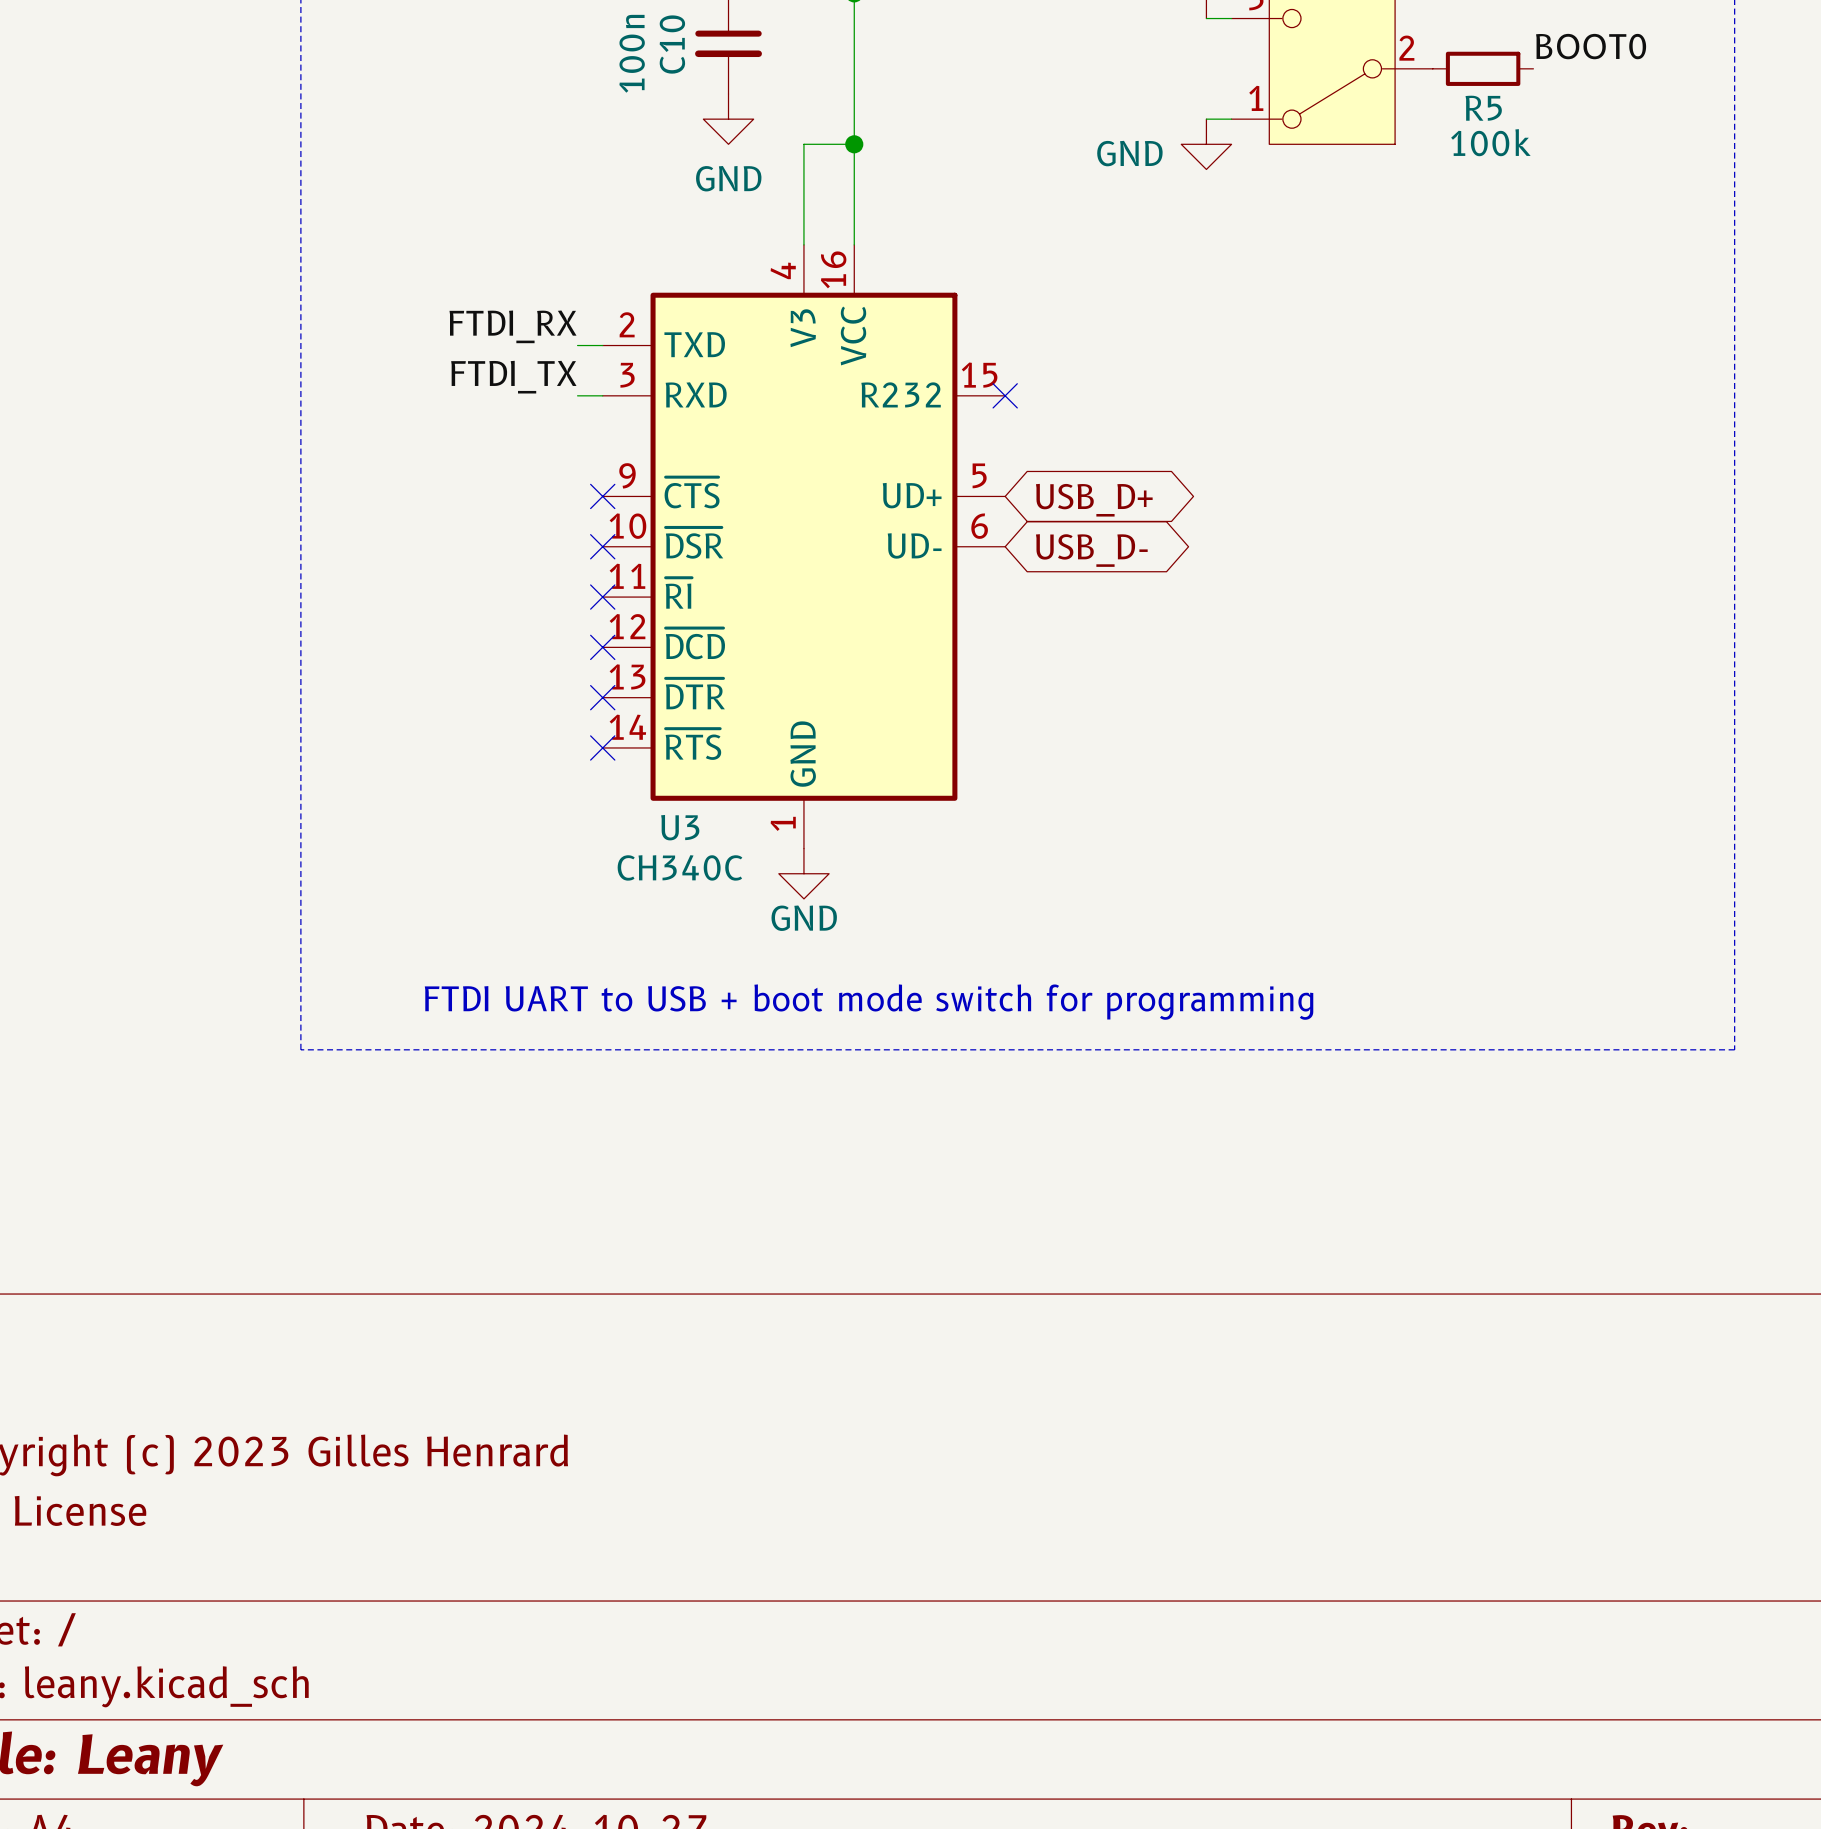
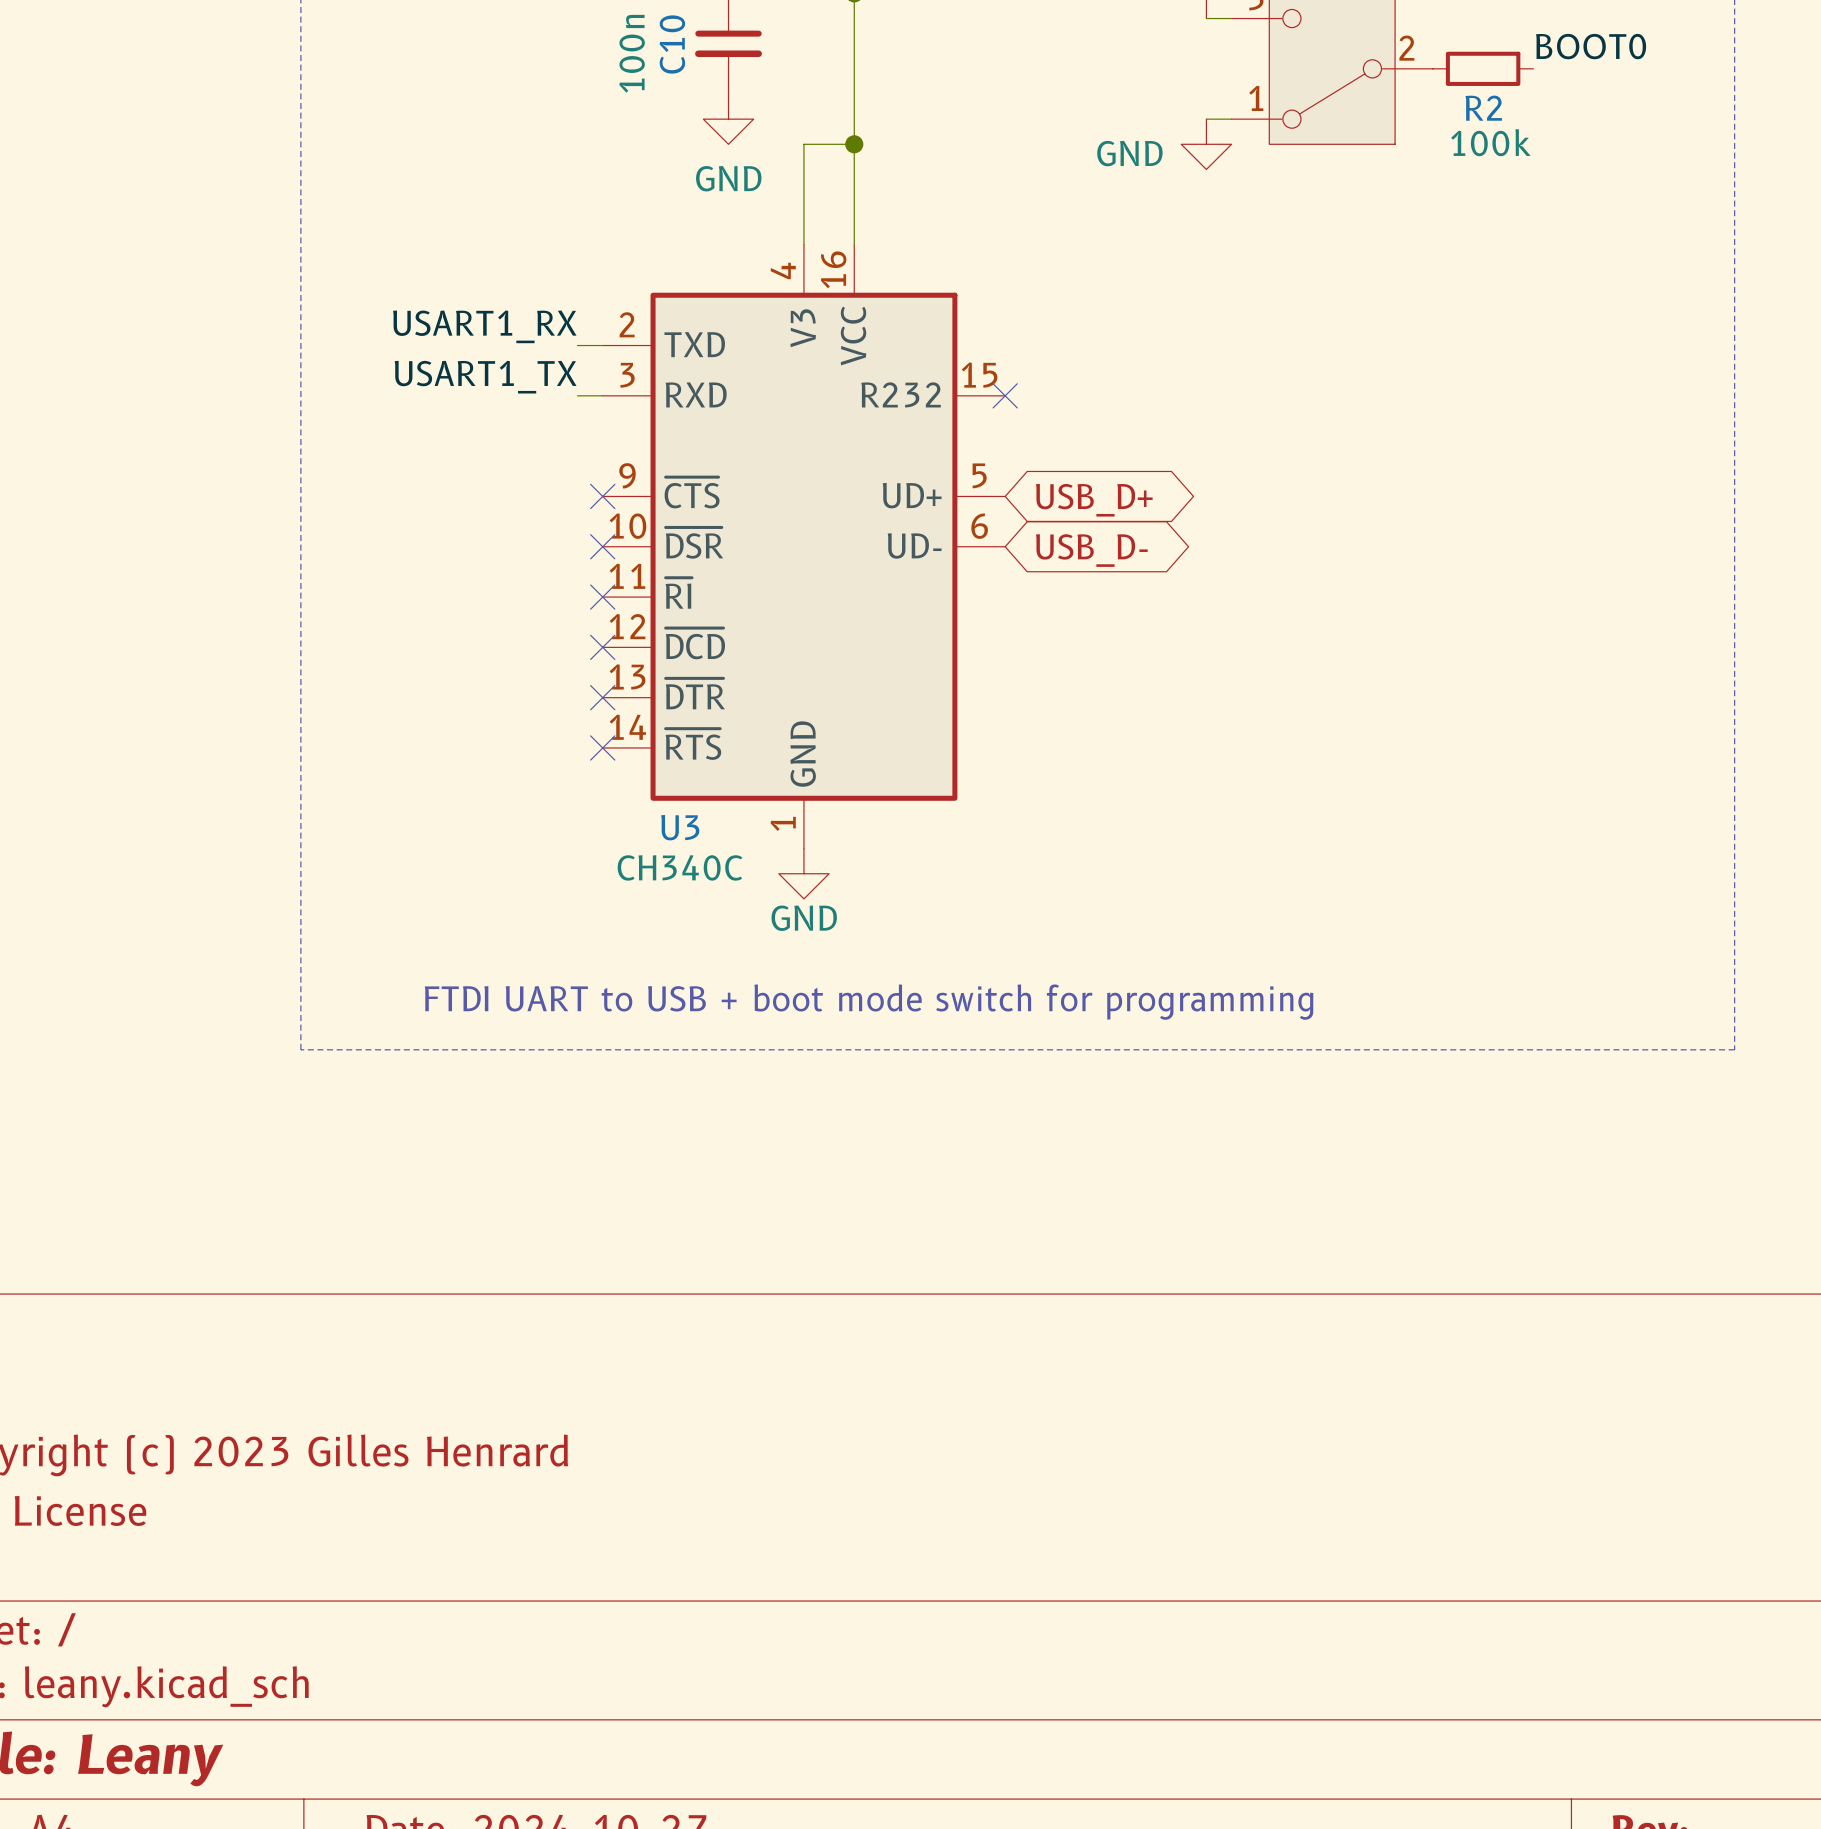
R5 name: R5 (1483, 108) -> R2 (1483, 108)
label: FTDI_RX (513, 326) -> USART1_RX (484, 326)
label: FTDI_TX (513, 377) -> USART1_TX (485, 377)

